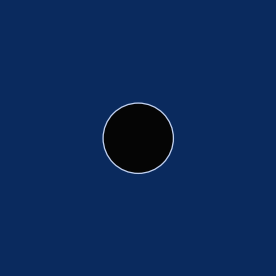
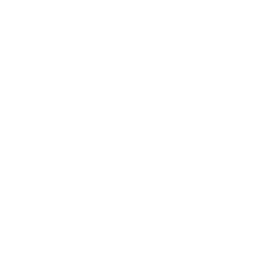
part: (138, 138) -> none

